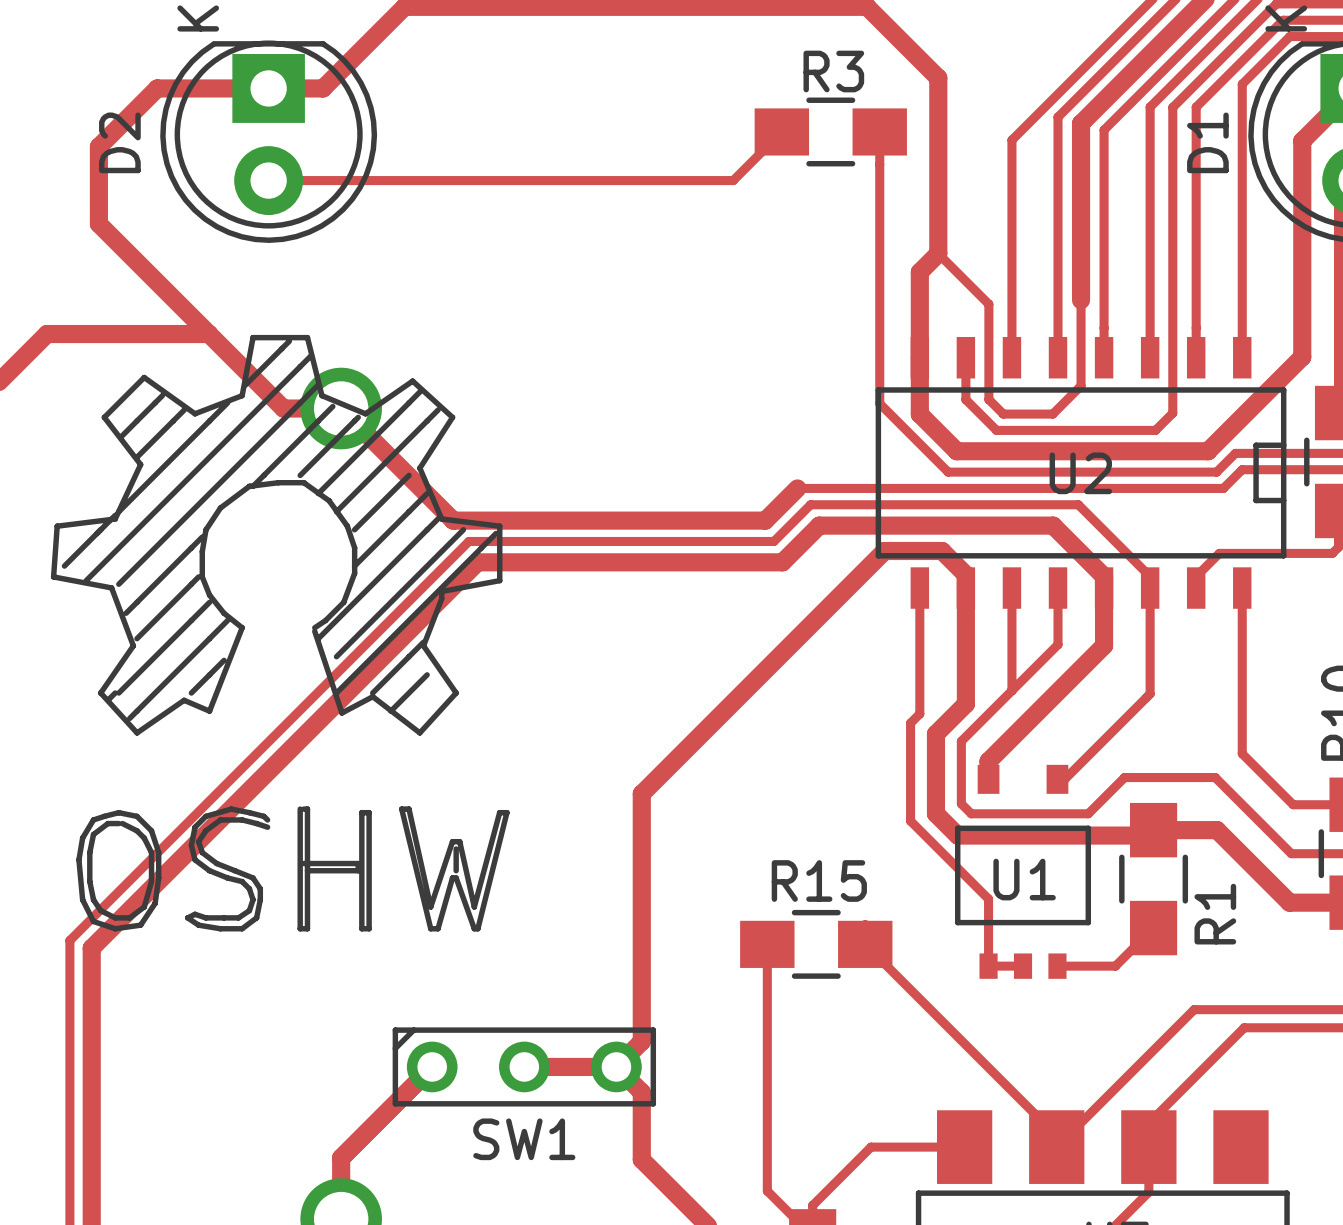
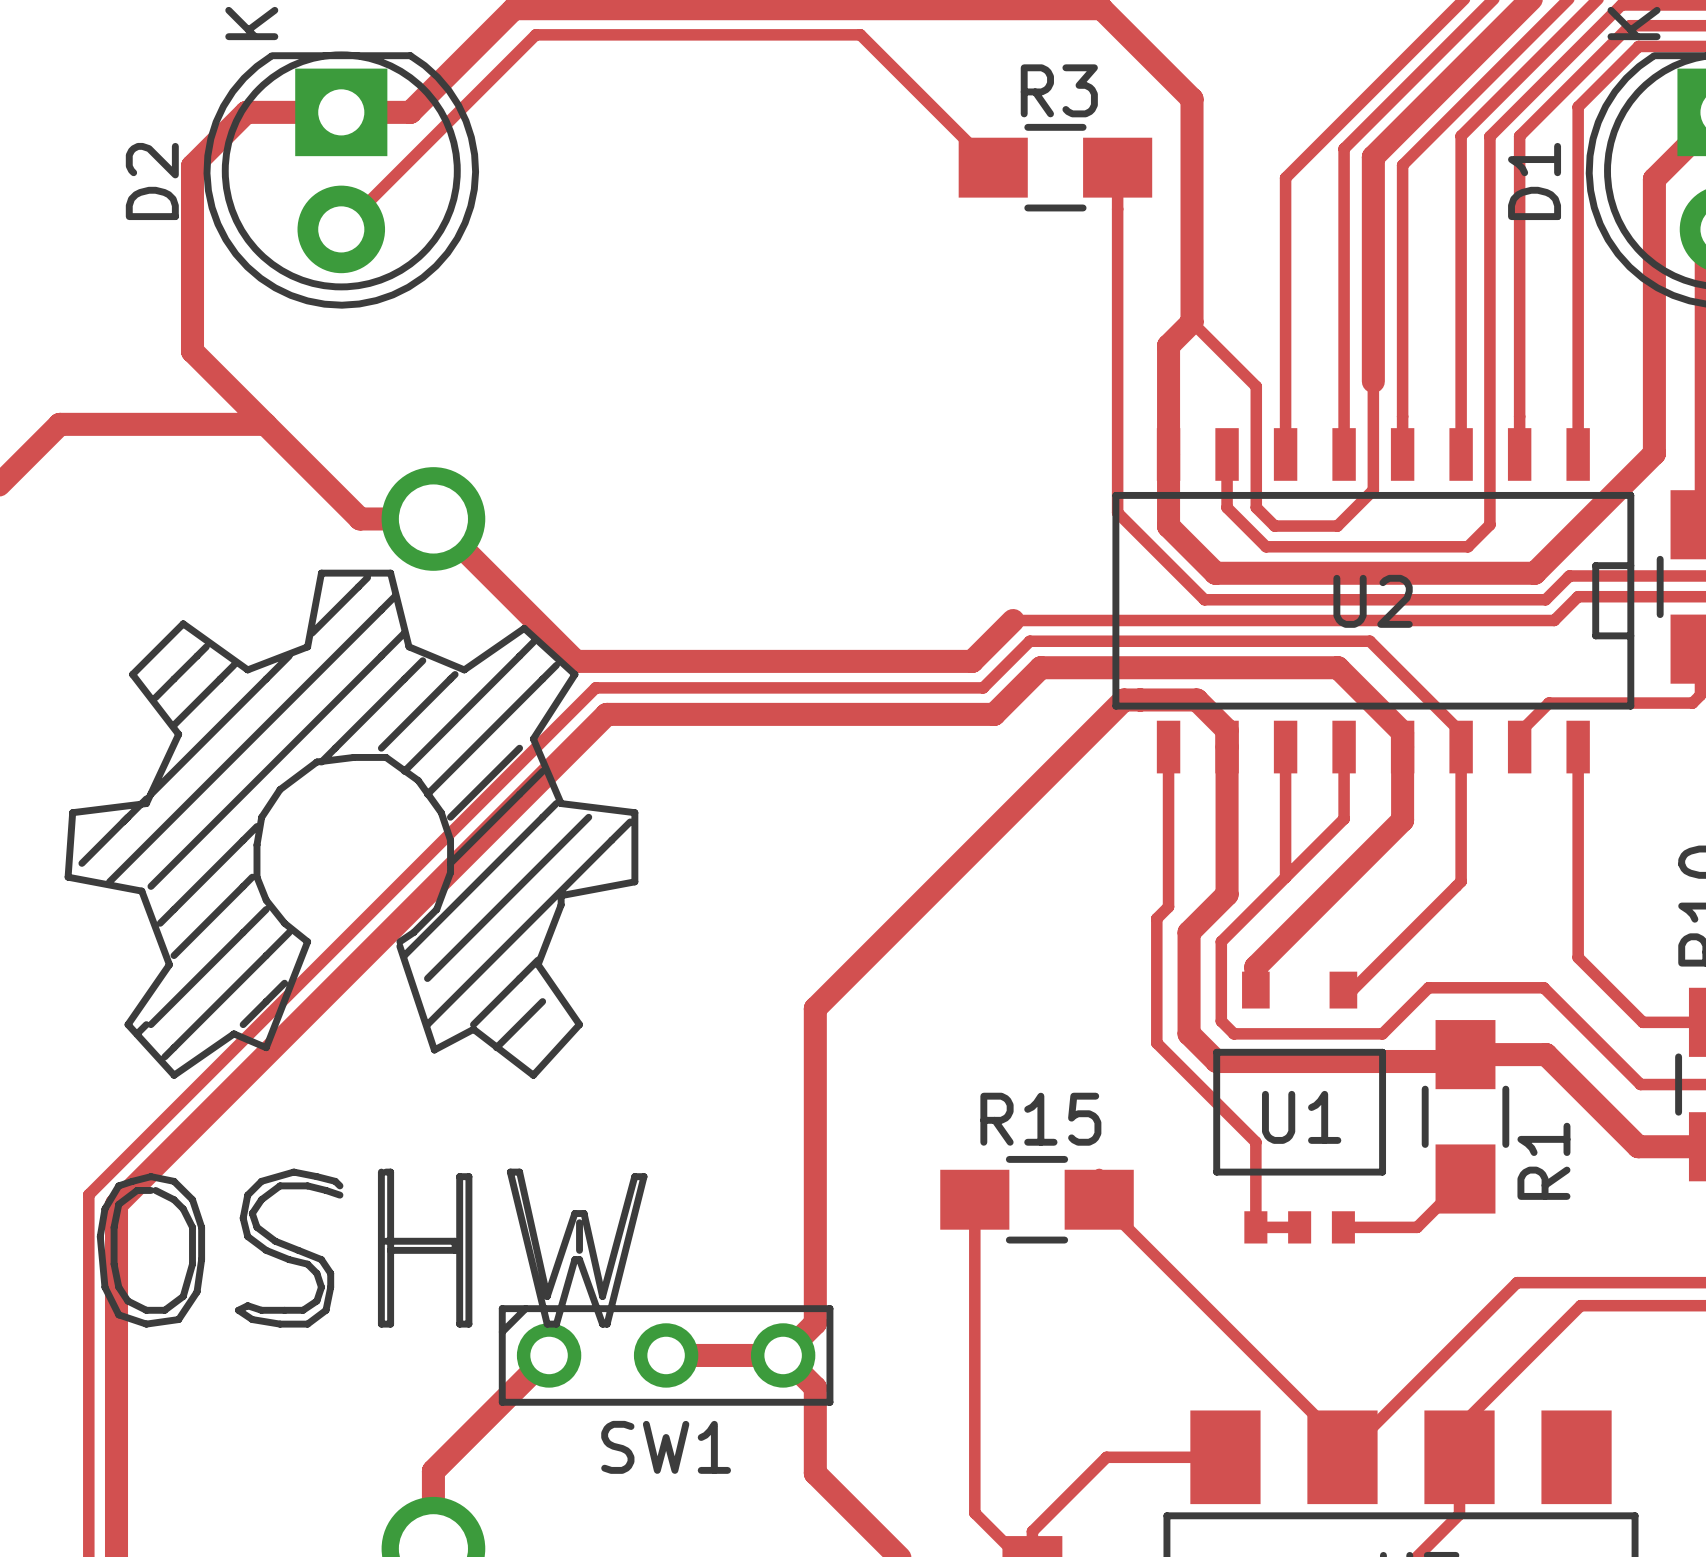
top track: (193, 88) (157, 88) (98, 146) (98, 223) (151, 276) -> (246, 112) (192, 166) (192, 351)
top track: (781, 131) (733, 180) (268, 180) -> (993, 167) (860, 34) (535, 34) (341, 229)
drawing position: (280, 633) -> (356, 948)

